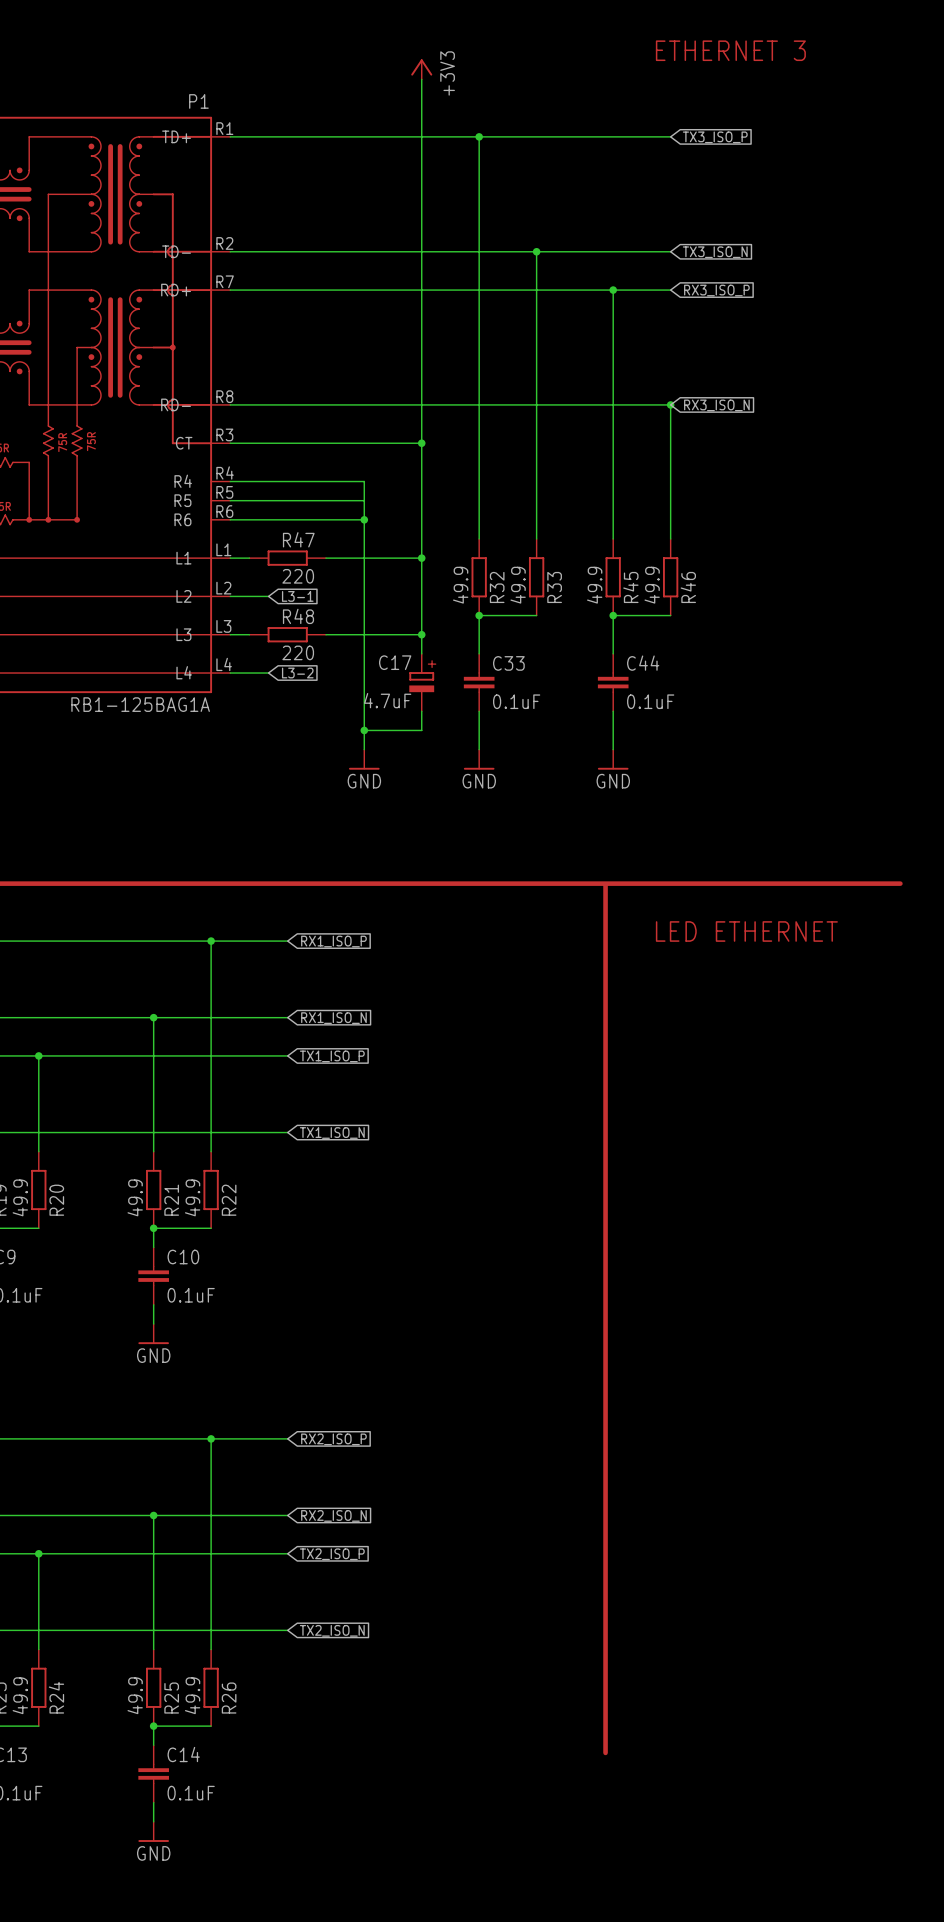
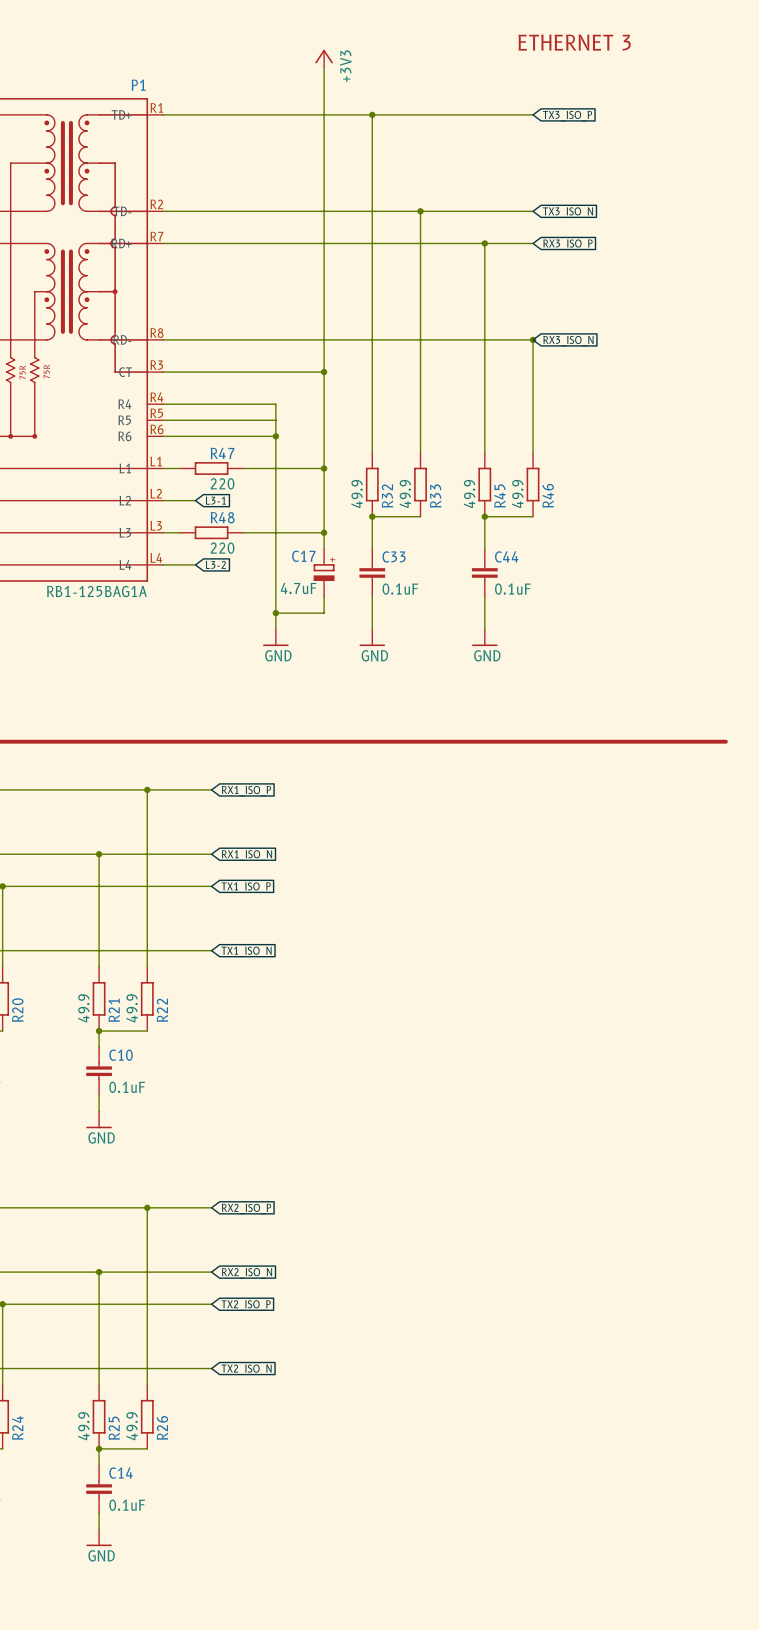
line: (605, 885) (605, 1752) -> none
text: LED ETHERNET (746, 931) -> none

